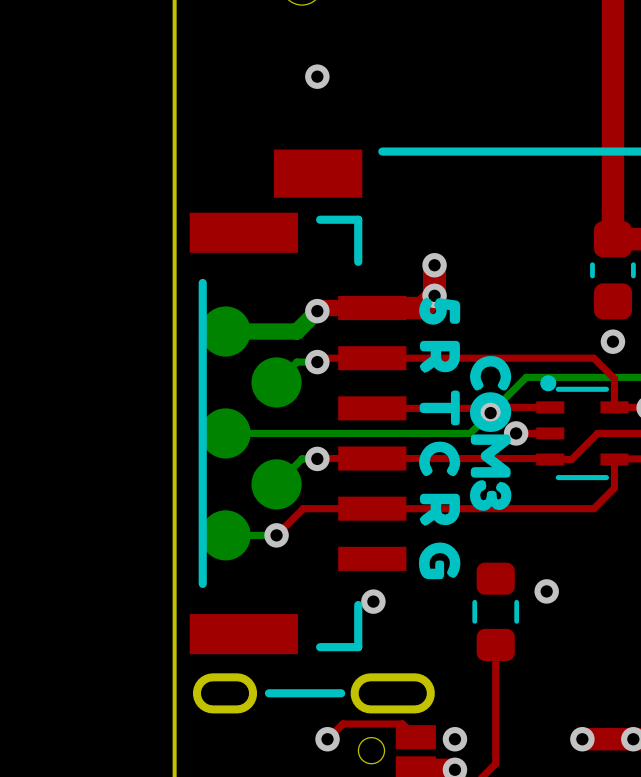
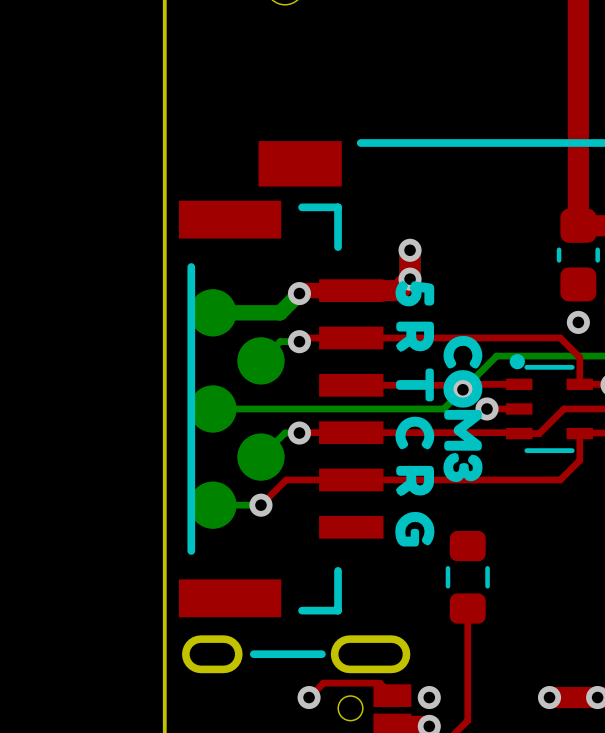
via: (317, 76) -> none
via: (546, 591) -> none
via: (373, 601) -> none

